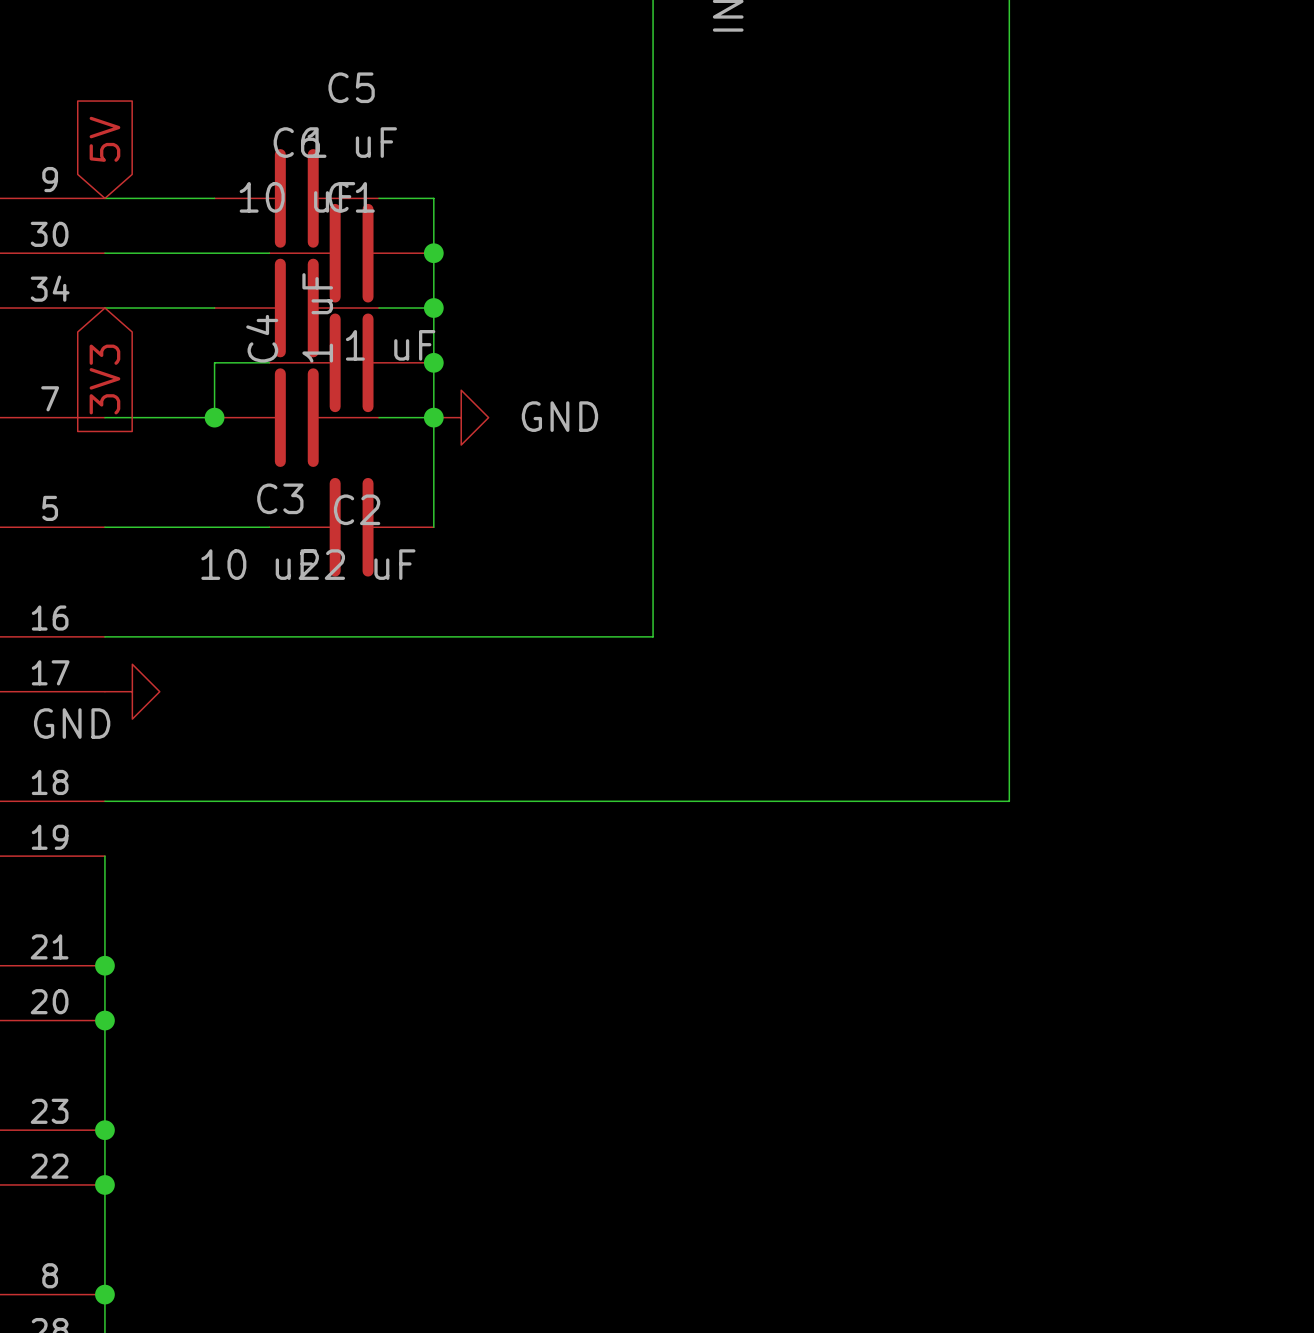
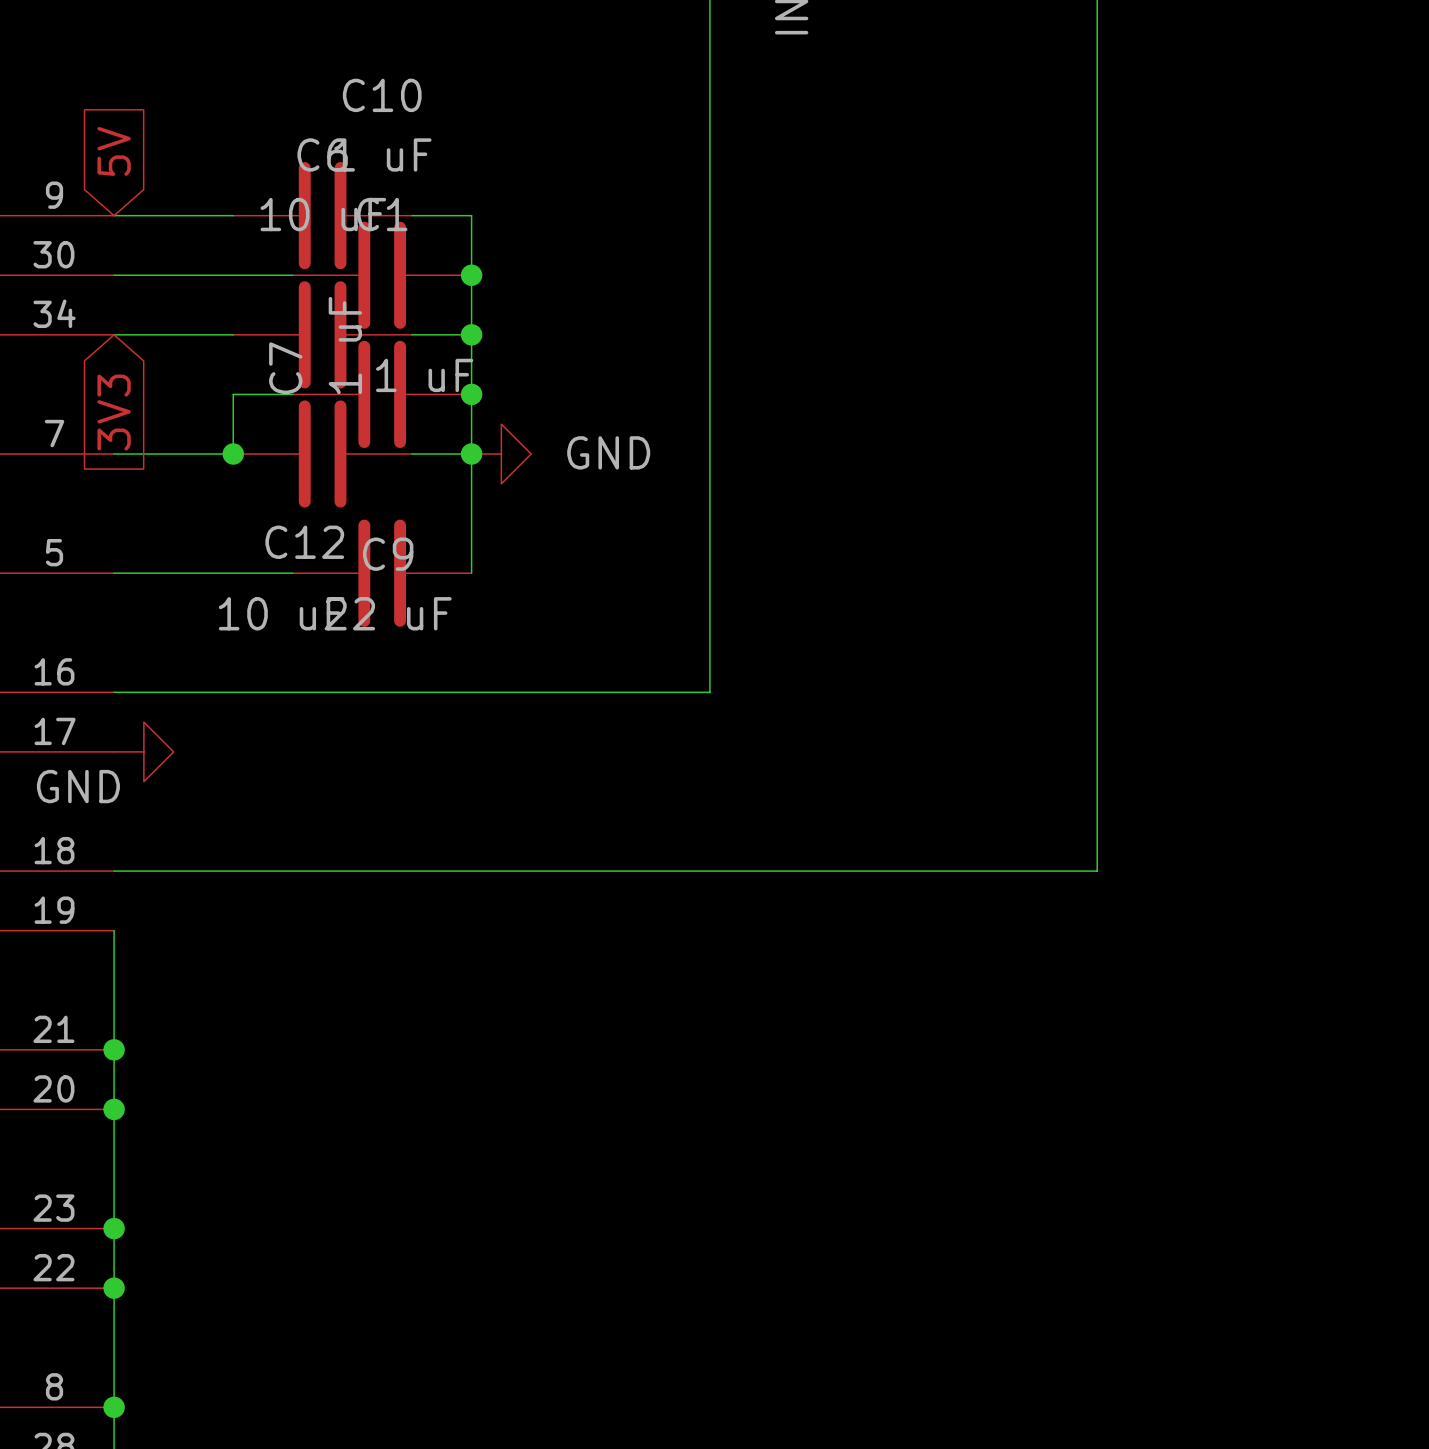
C5 name: C5 (351, 87) -> C10 (382, 95)
C4 name: C4 (262, 338) -> C7 (285, 368)
C3 name: C3 (280, 498) -> C12 (304, 542)
C2 name: C2 (357, 509) -> C9 (388, 554)

